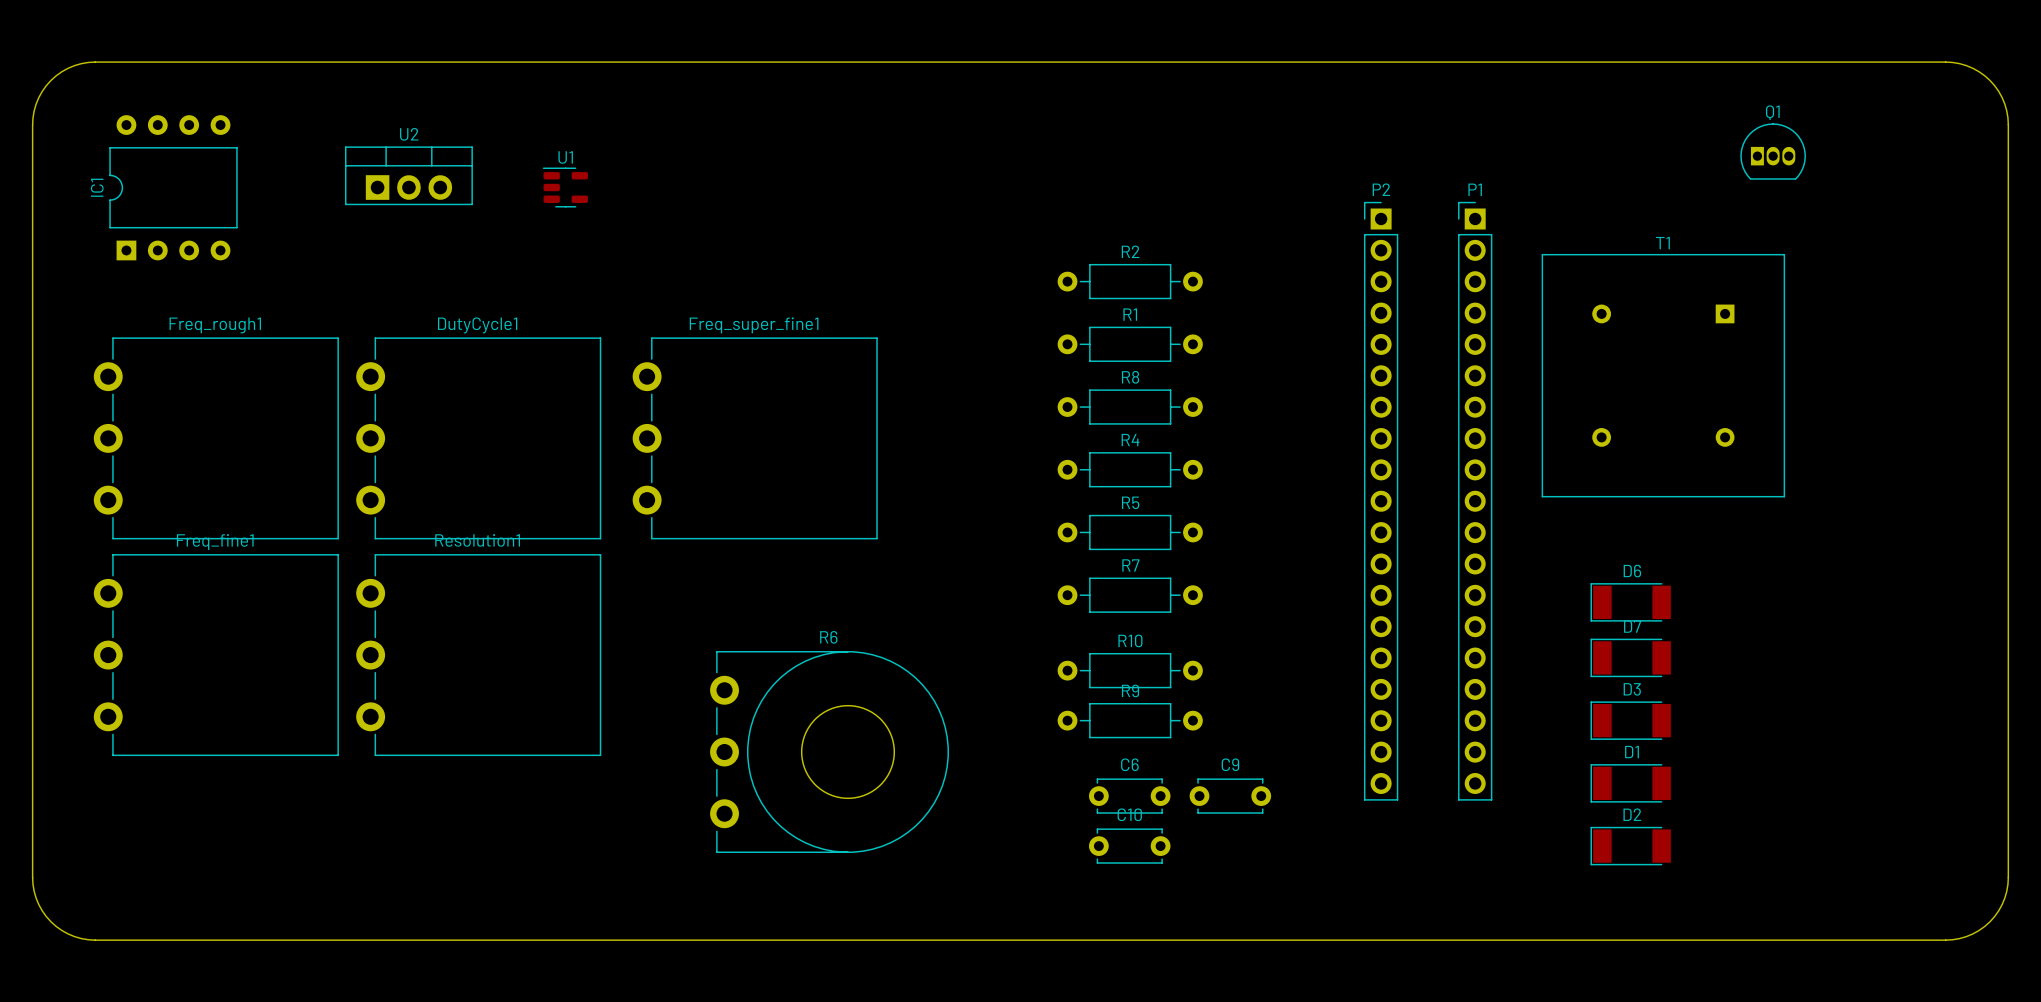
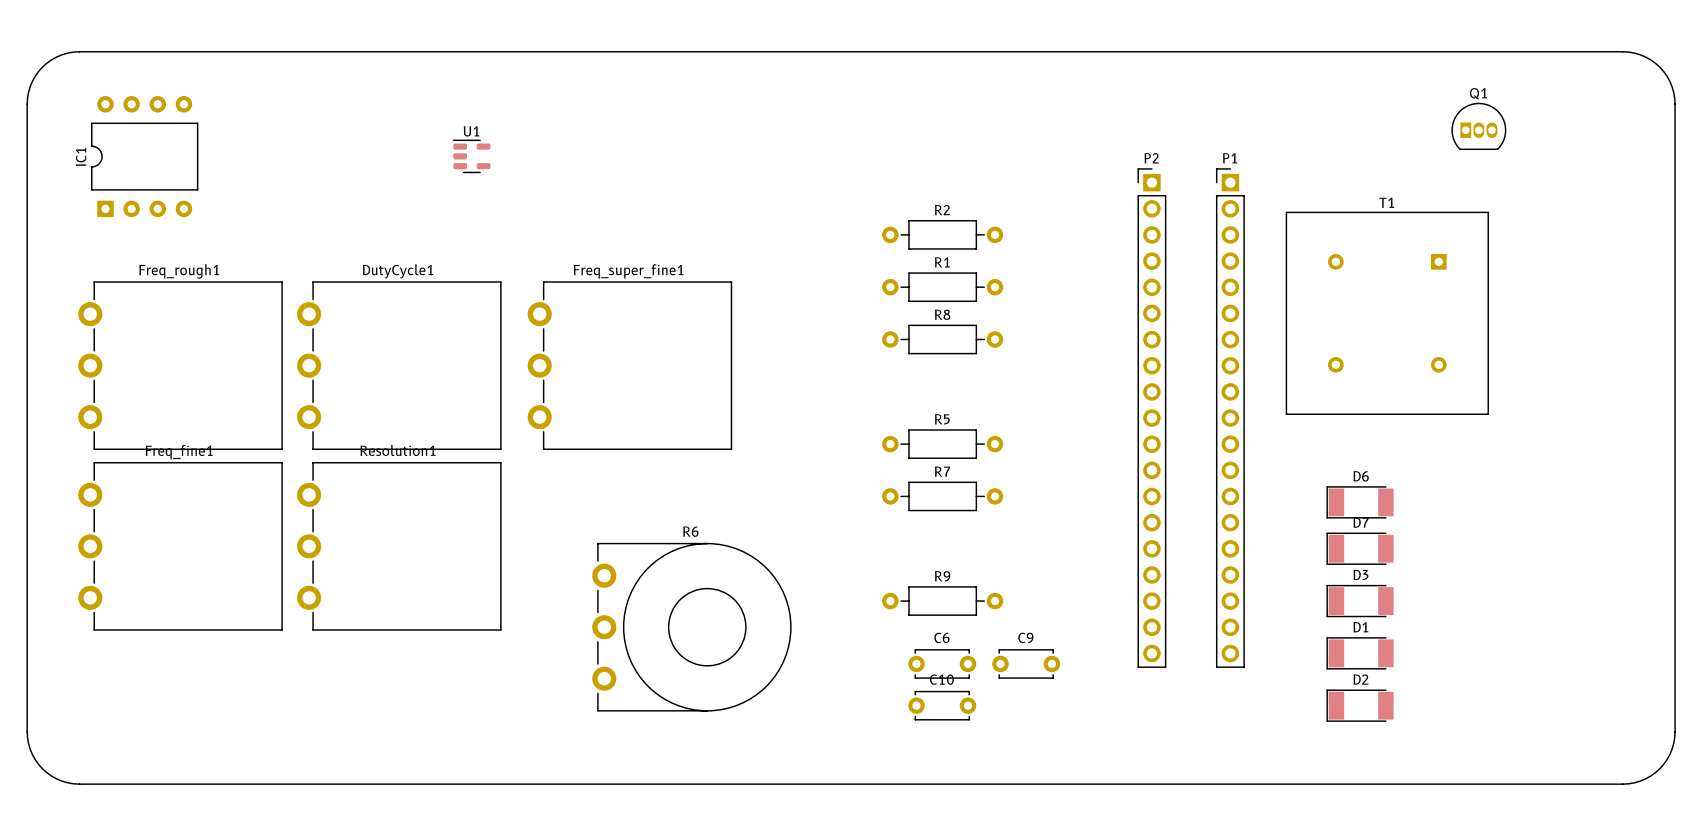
U2: (408, 175) -> none
R4: (1130, 469) -> none
R10: (1130, 670) -> none

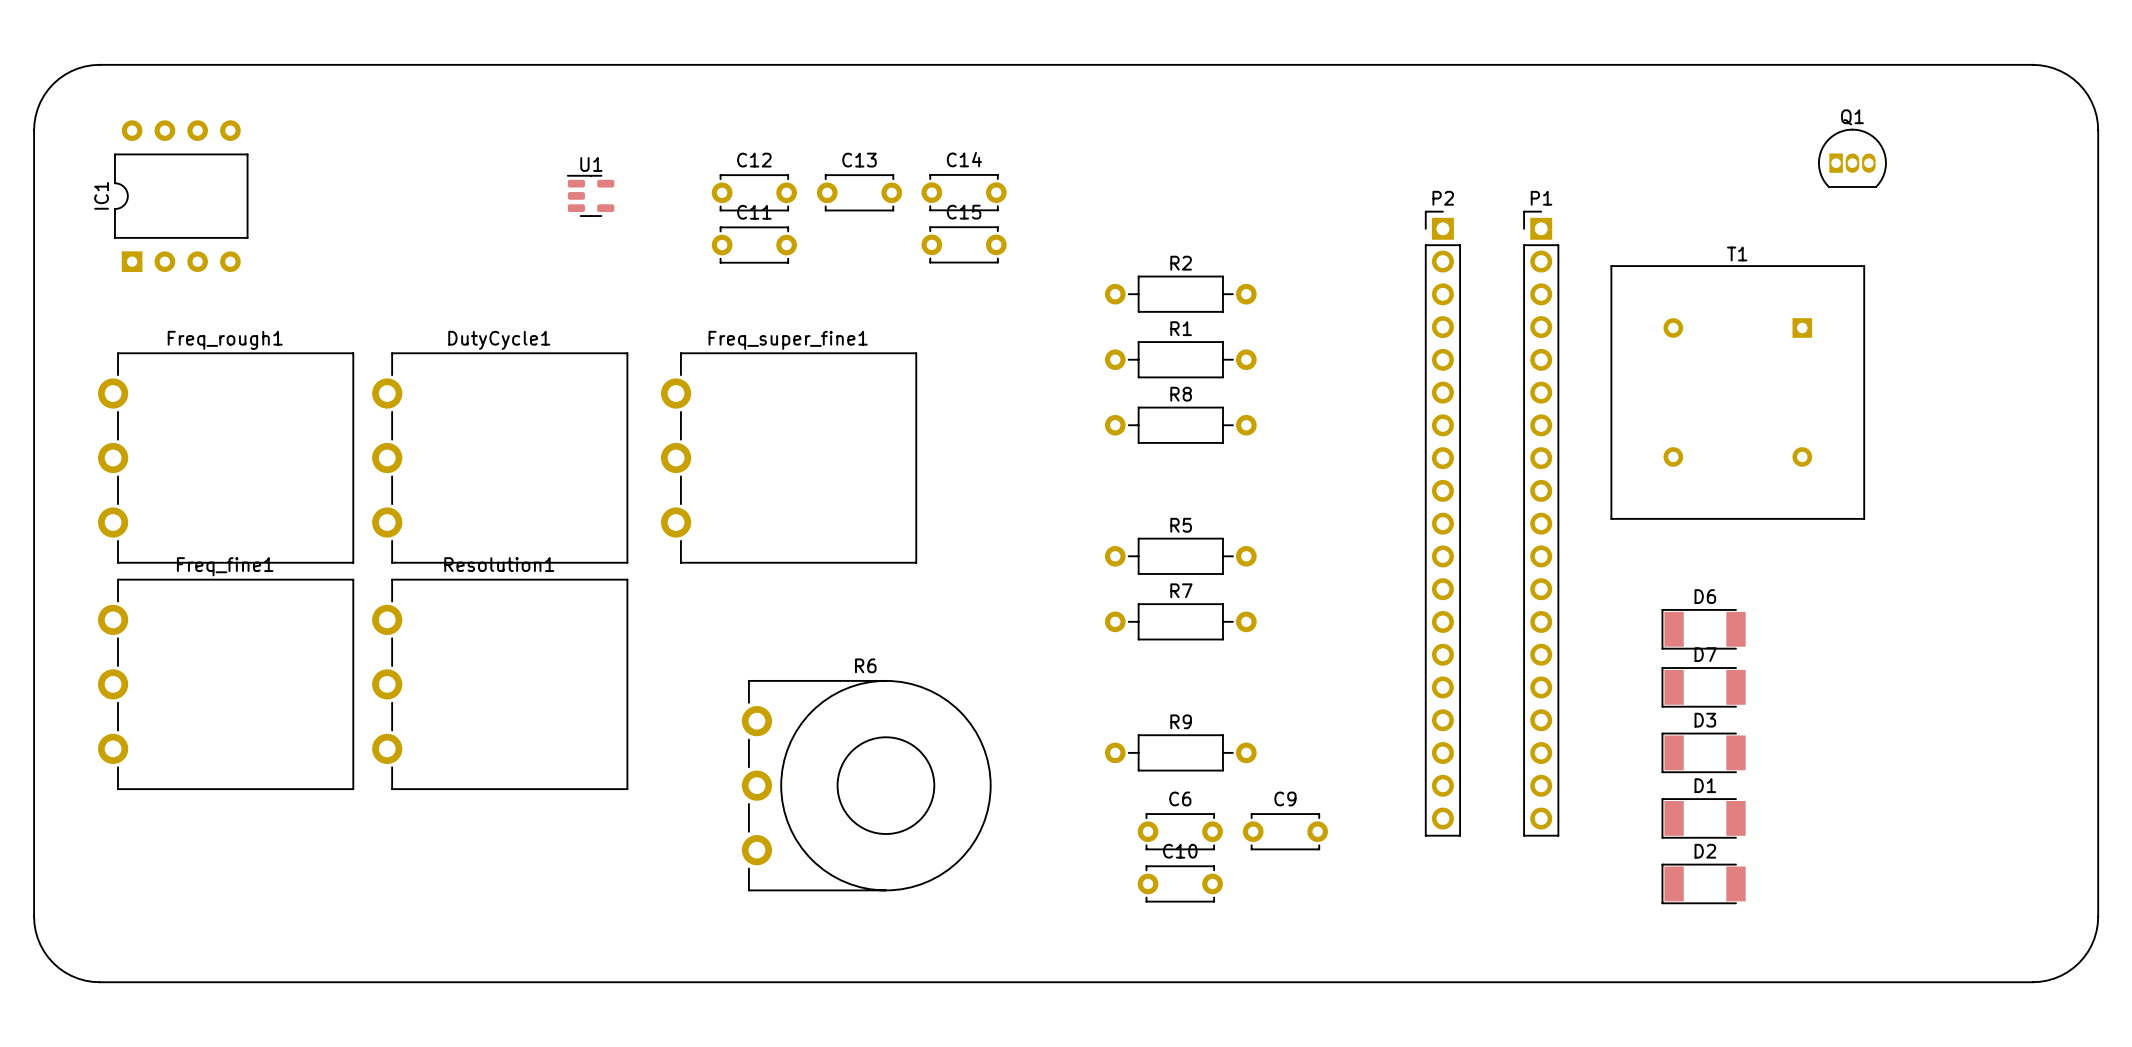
C12: none -> (754, 192)
C13: none -> (859, 192)
C14: none -> (964, 192)
C11: none -> (754, 245)
C15: none -> (964, 244)

